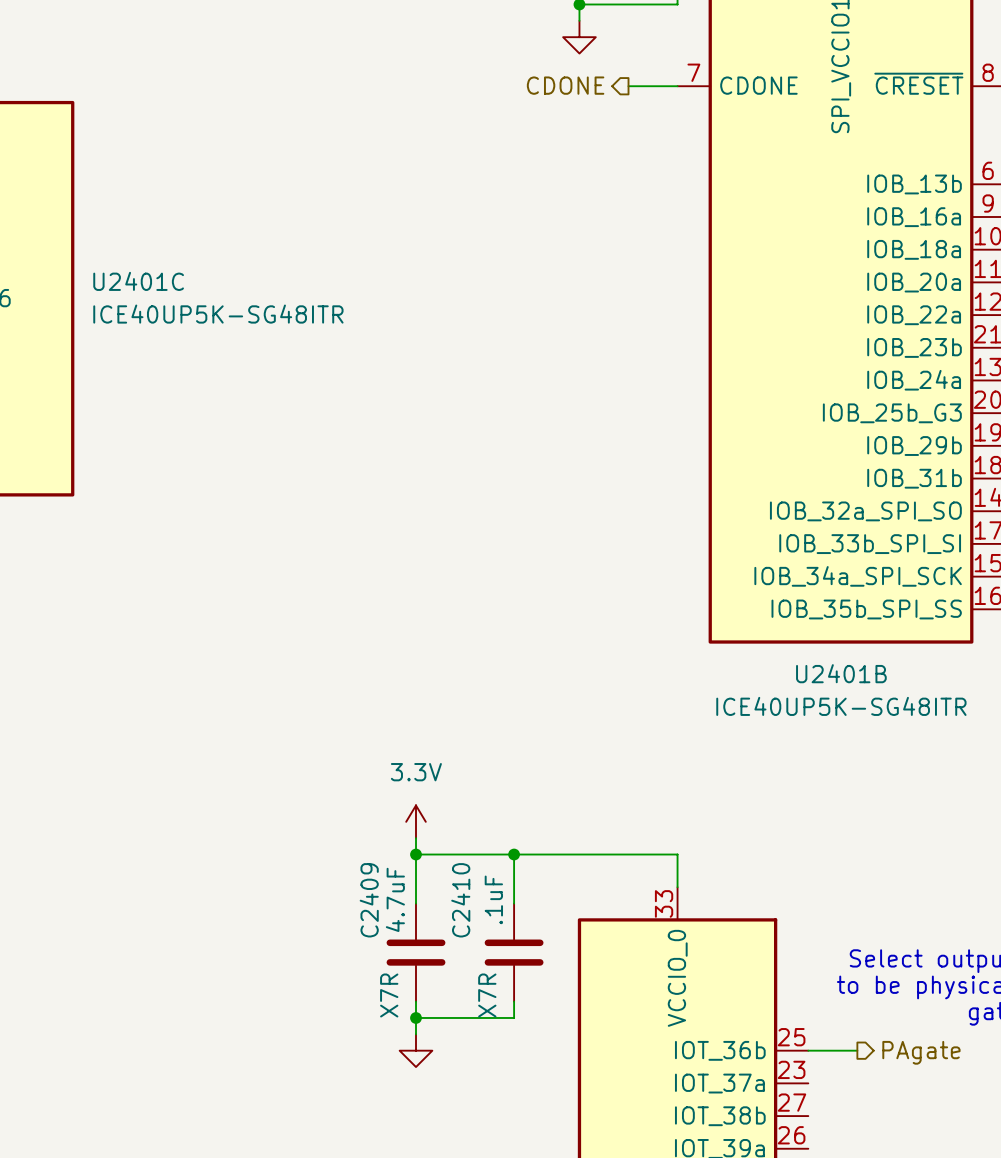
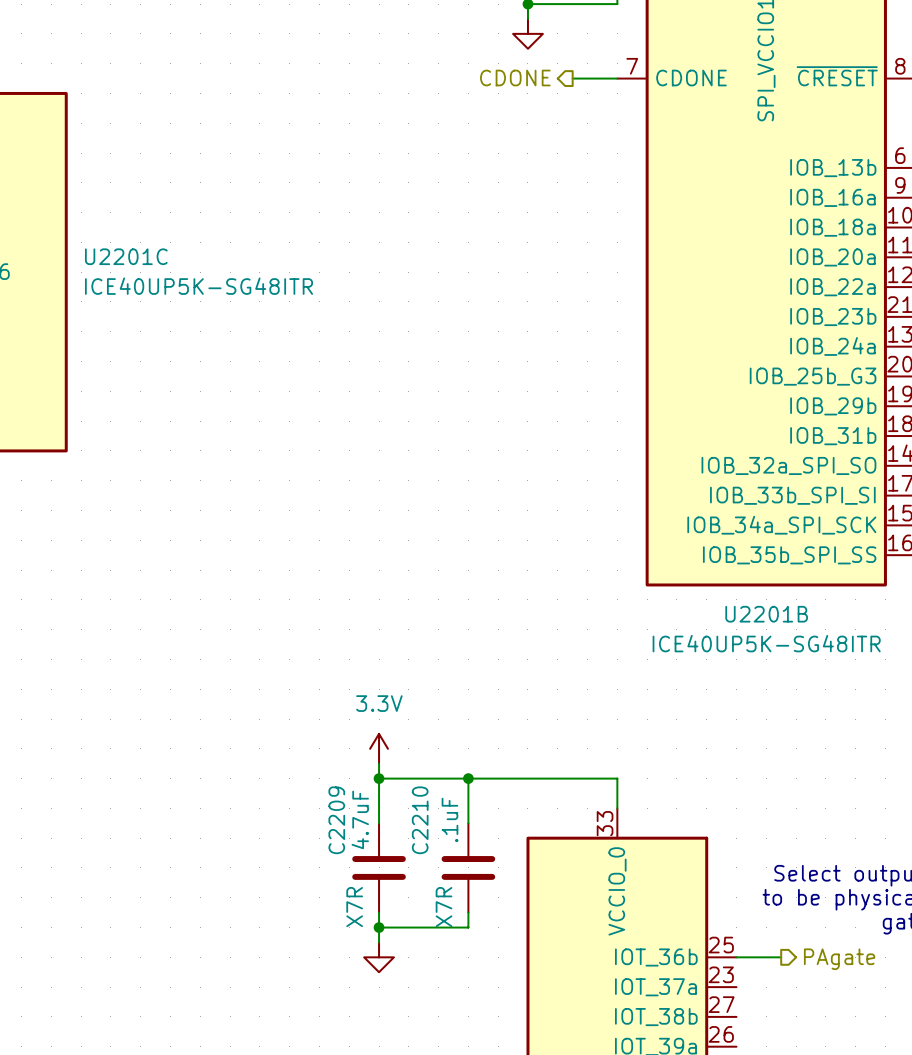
U2401C name: U2401C (138, 281) -> U2201C (126, 256)
U2401B name: U2401B (841, 673) -> U2201B (766, 614)
C2409 name: C2409 (369, 900) -> C2209 (336, 820)
C2410 name: C2410 (460, 900) -> C2210 (420, 820)

